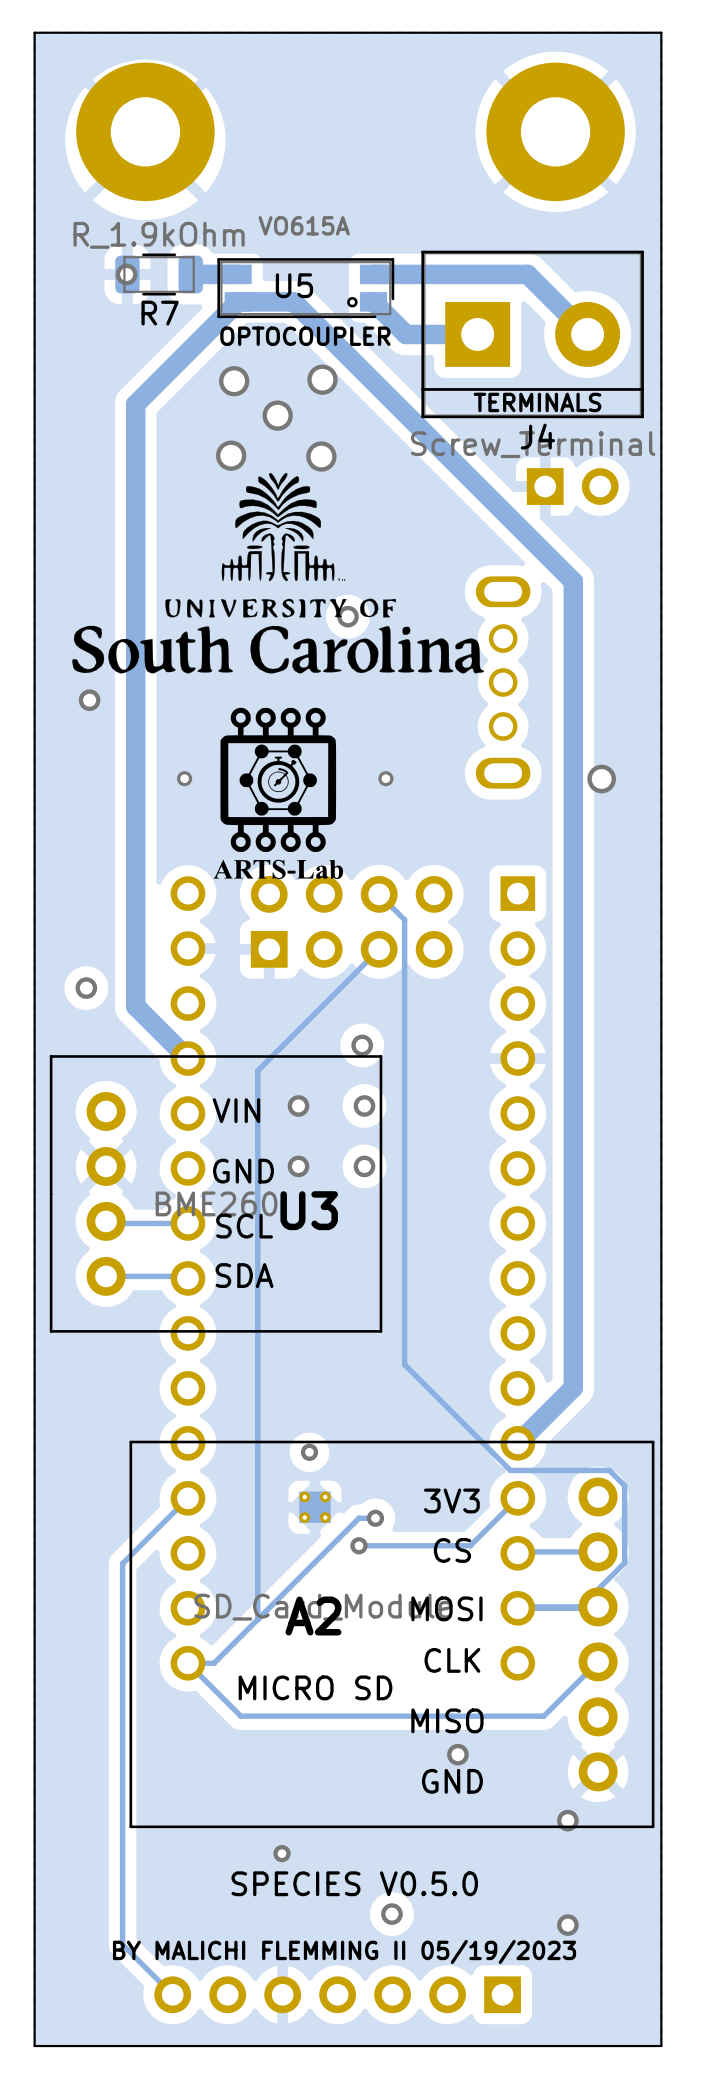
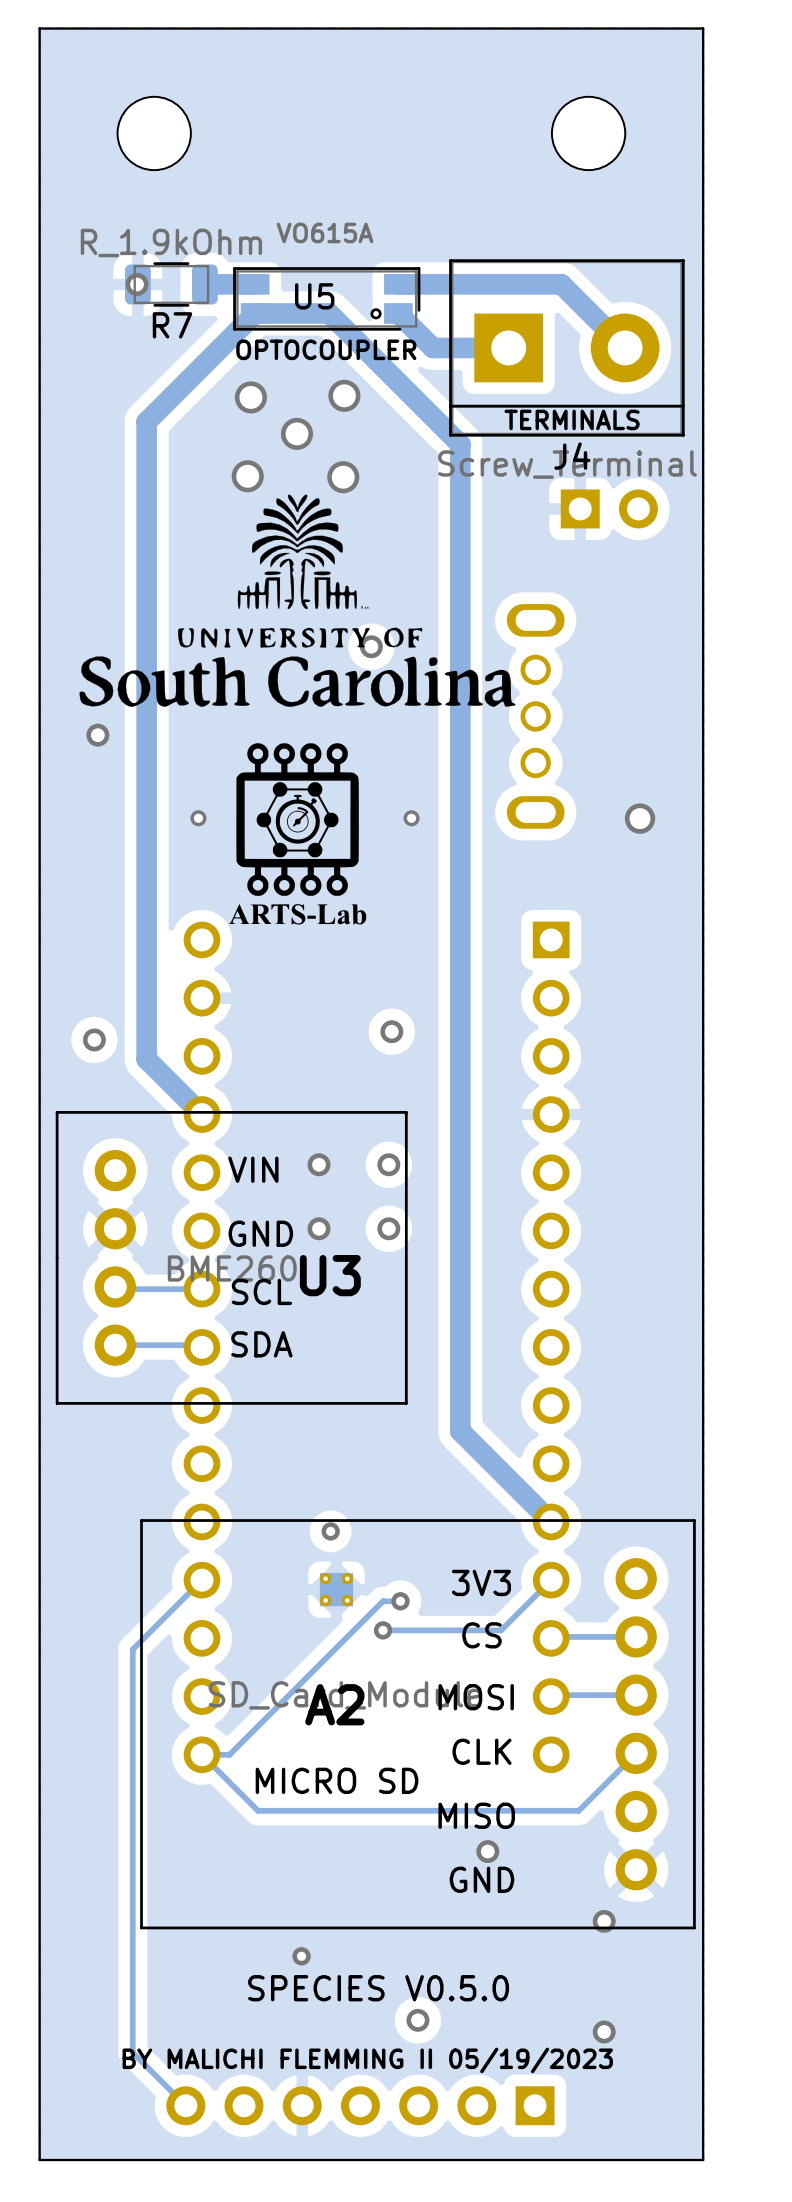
part footprint: [76, 62, 215, 202] -> [117, 96, 191, 171]
part footprint: [486, 62, 625, 202] -> [551, 96, 626, 171]
track: (293, 301) (573, 581) (573, 1387) (517, 1443) -> (313, 313) (329, 313) (460, 444) (460, 1431) (551, 1521)
track: (379, 894) (404, 919) (404, 1364) (510, 1470) (609, 1470) (624, 1485) (624, 1562) (579, 1608) (517, 1608) -> none
part: (351, 921) -> none
track: (379, 949) (257, 1070) (257, 1619) -> none
via position: (362, 1045) -> (391, 1031)

